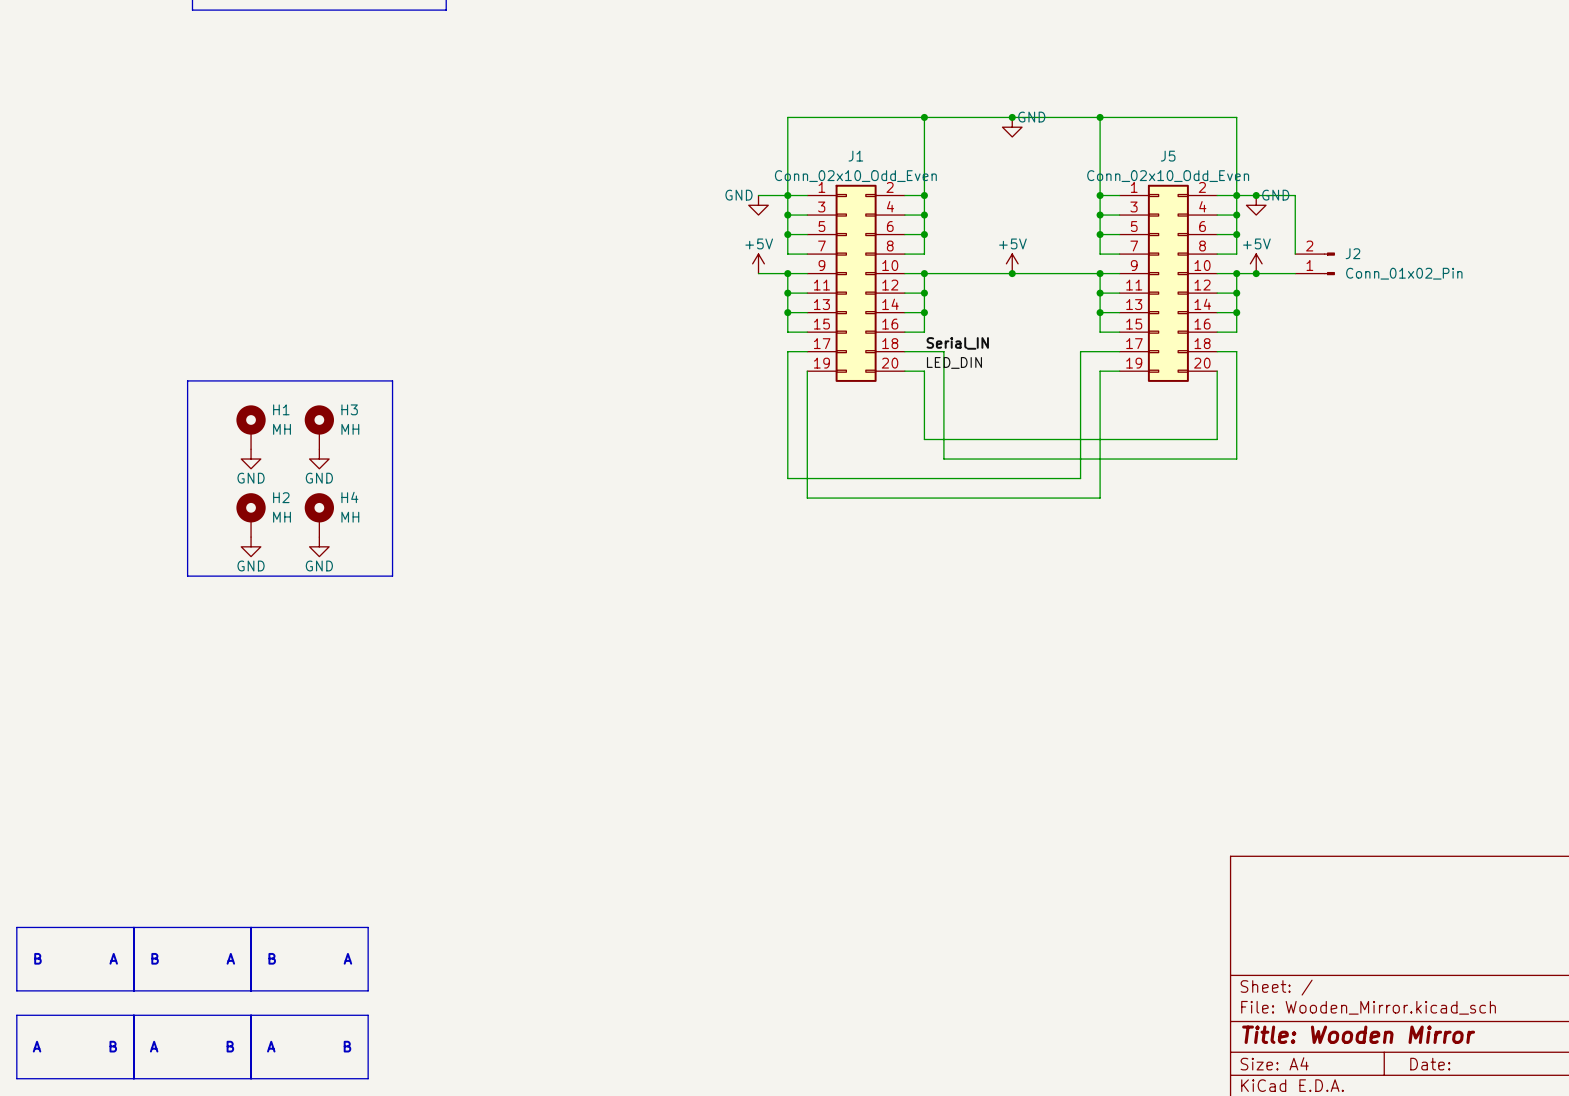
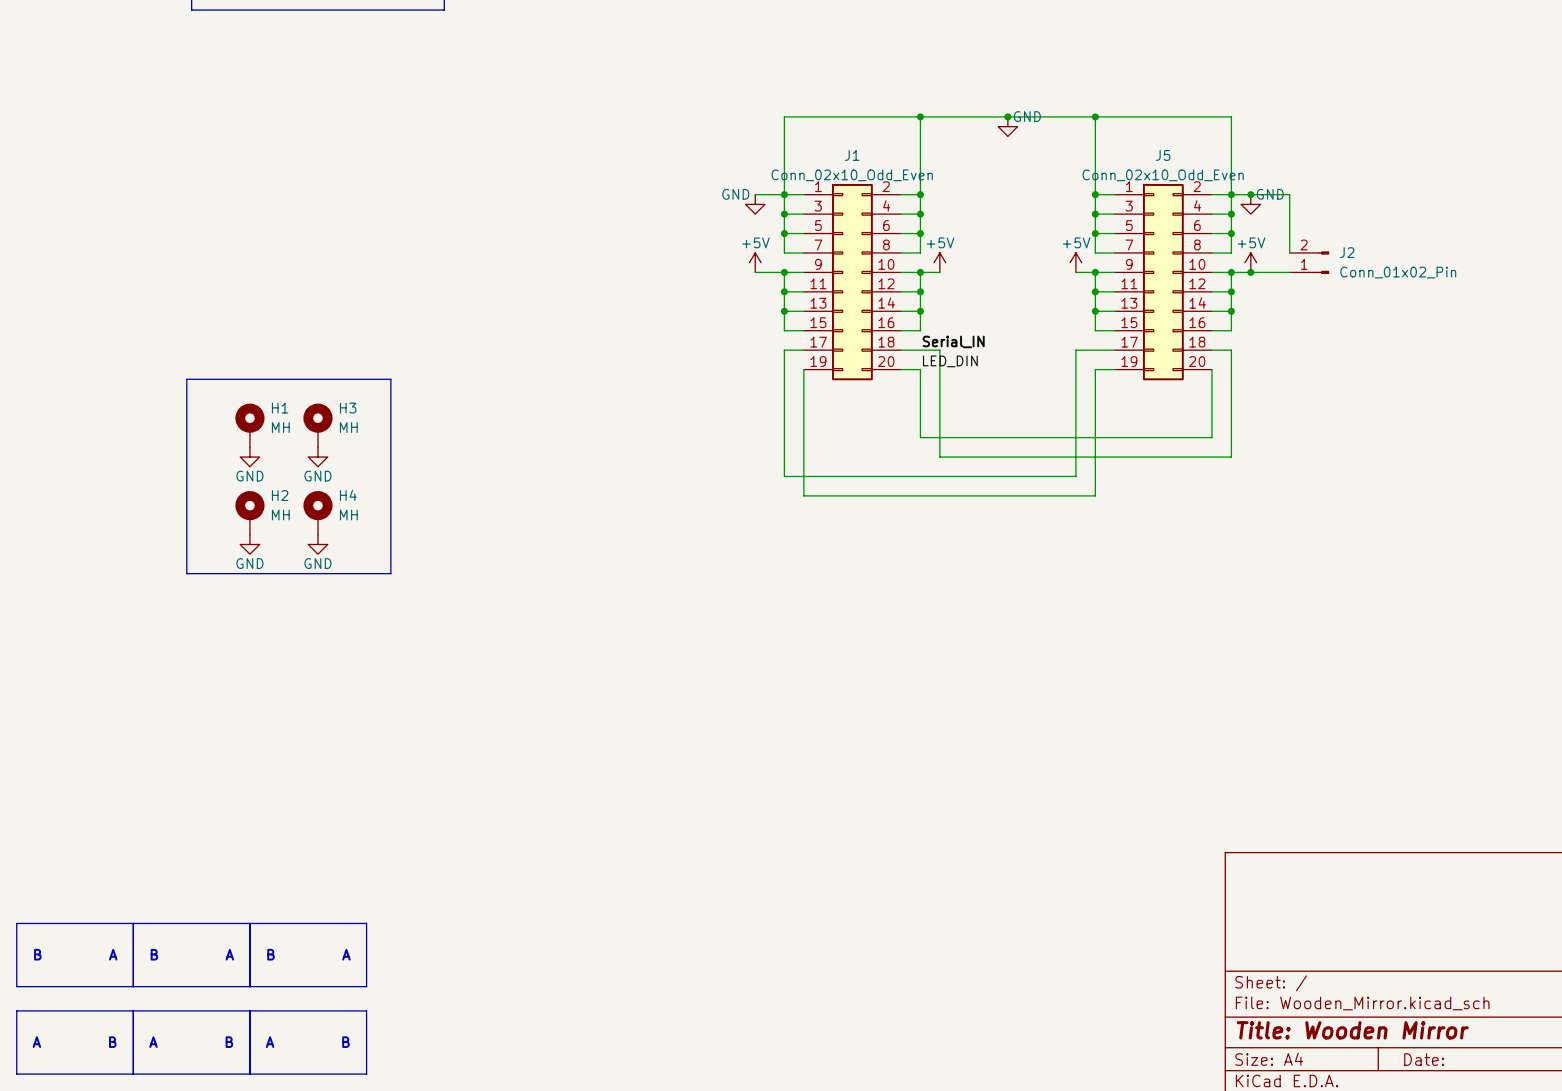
power symbol: none -> +5V (939, 262)
power symbol: +5V (1012, 263) -> none
power symbol: none -> +5V (1075, 262)
wire: (943, 273) (1080, 273) -> none
junction: (1012, 273) -> none

